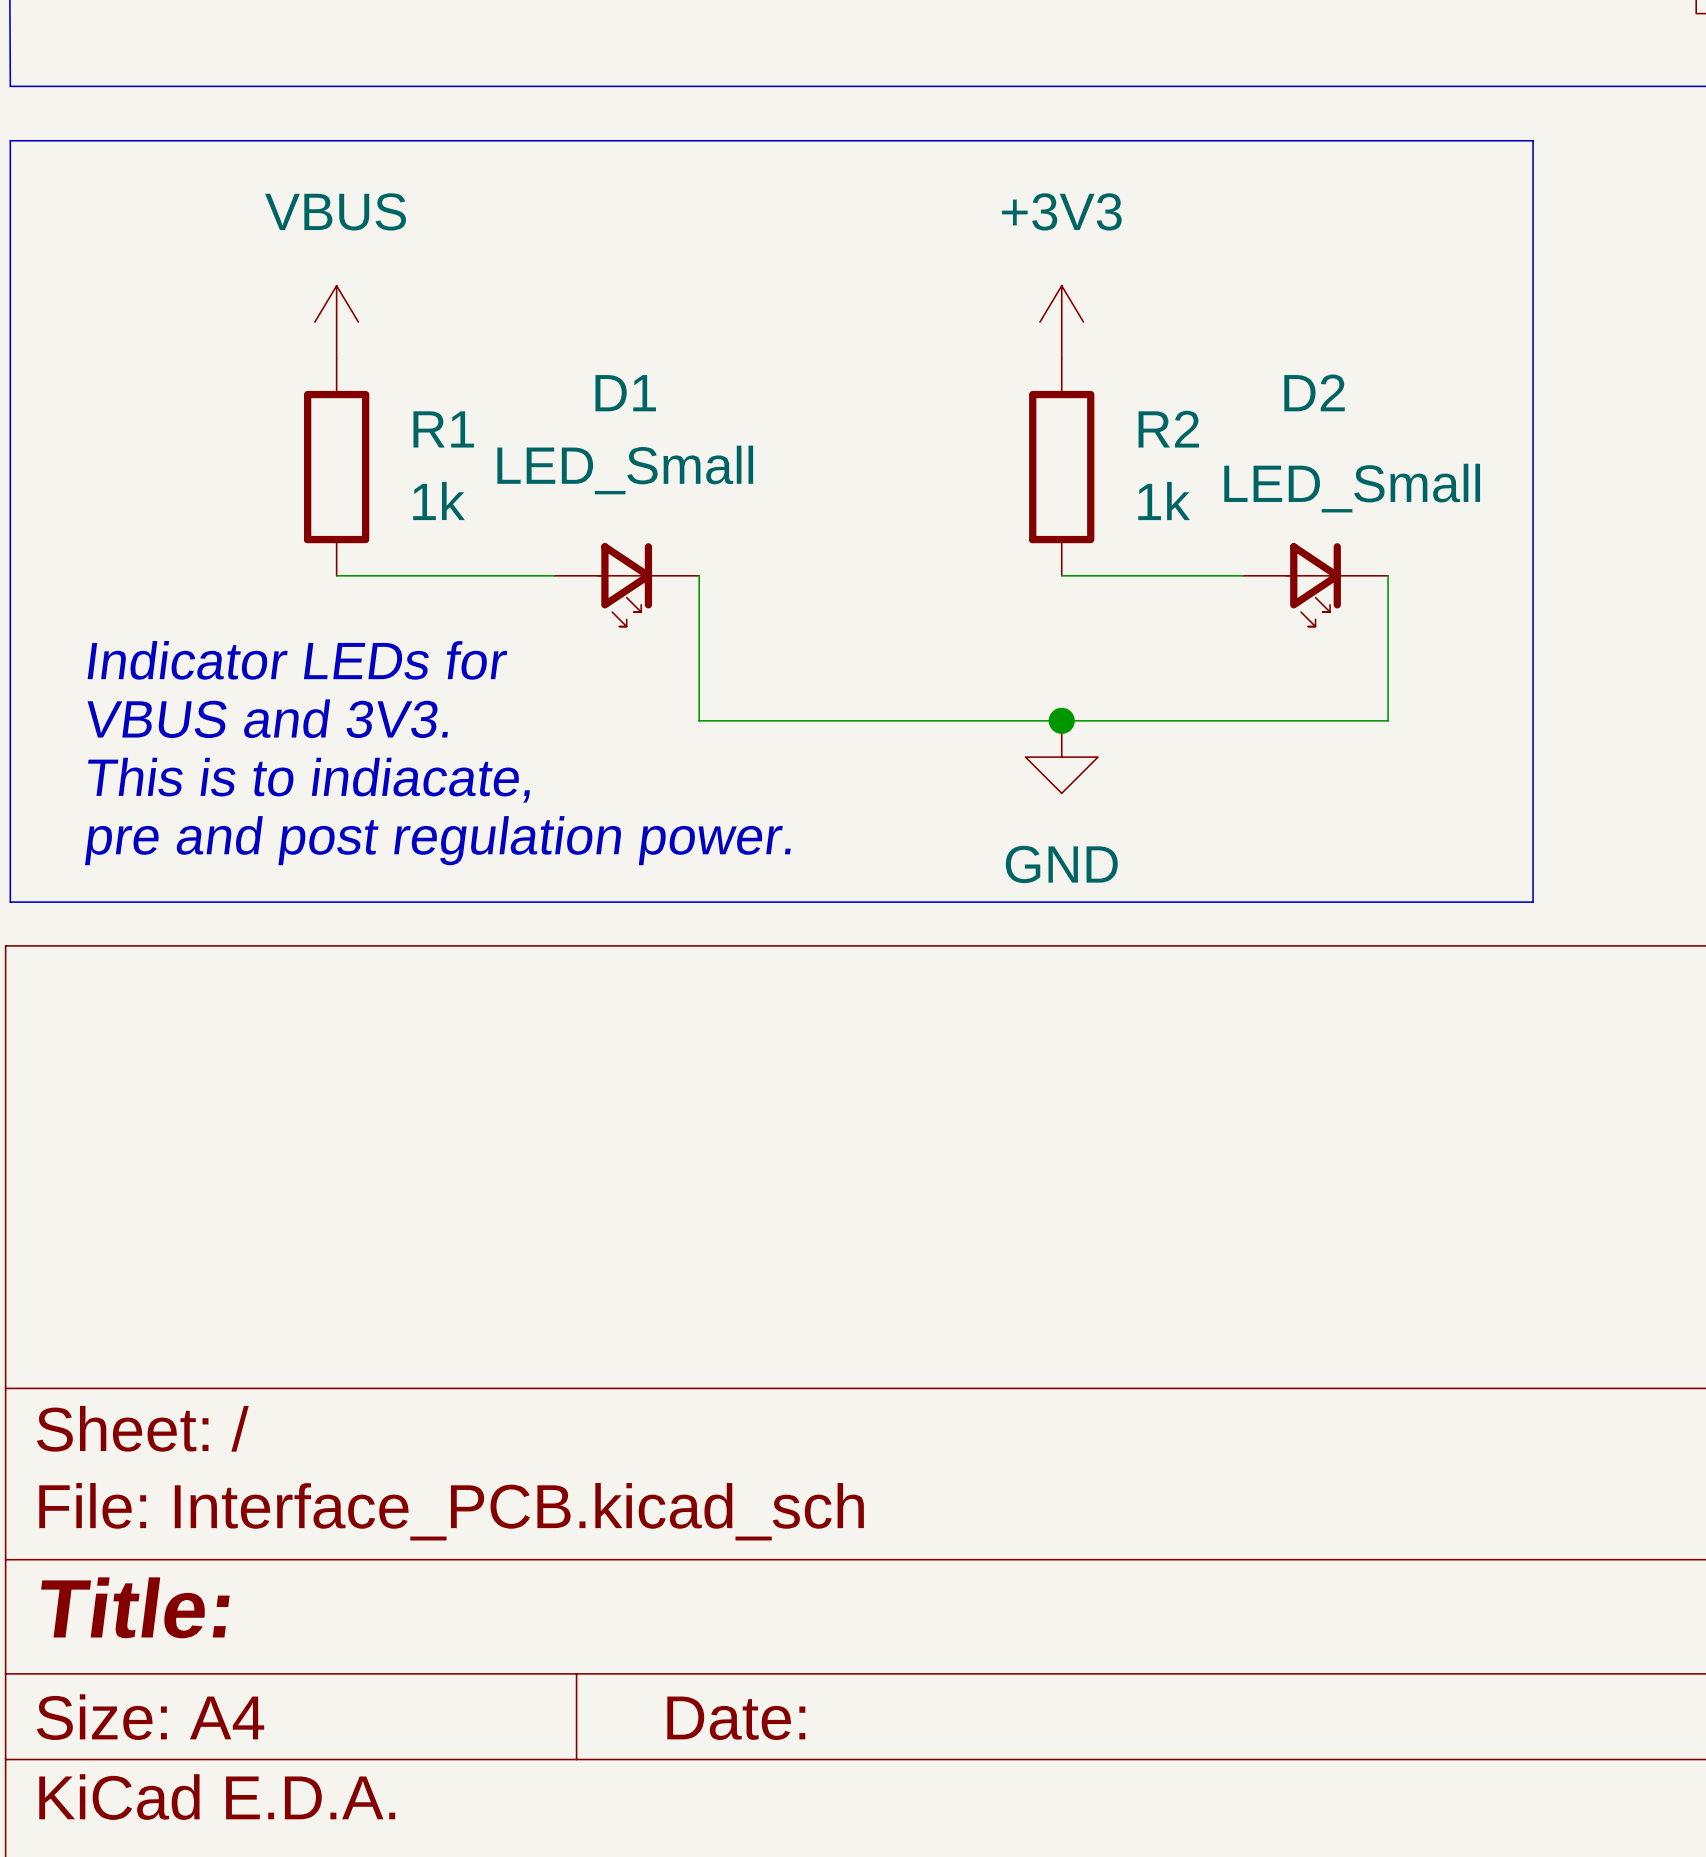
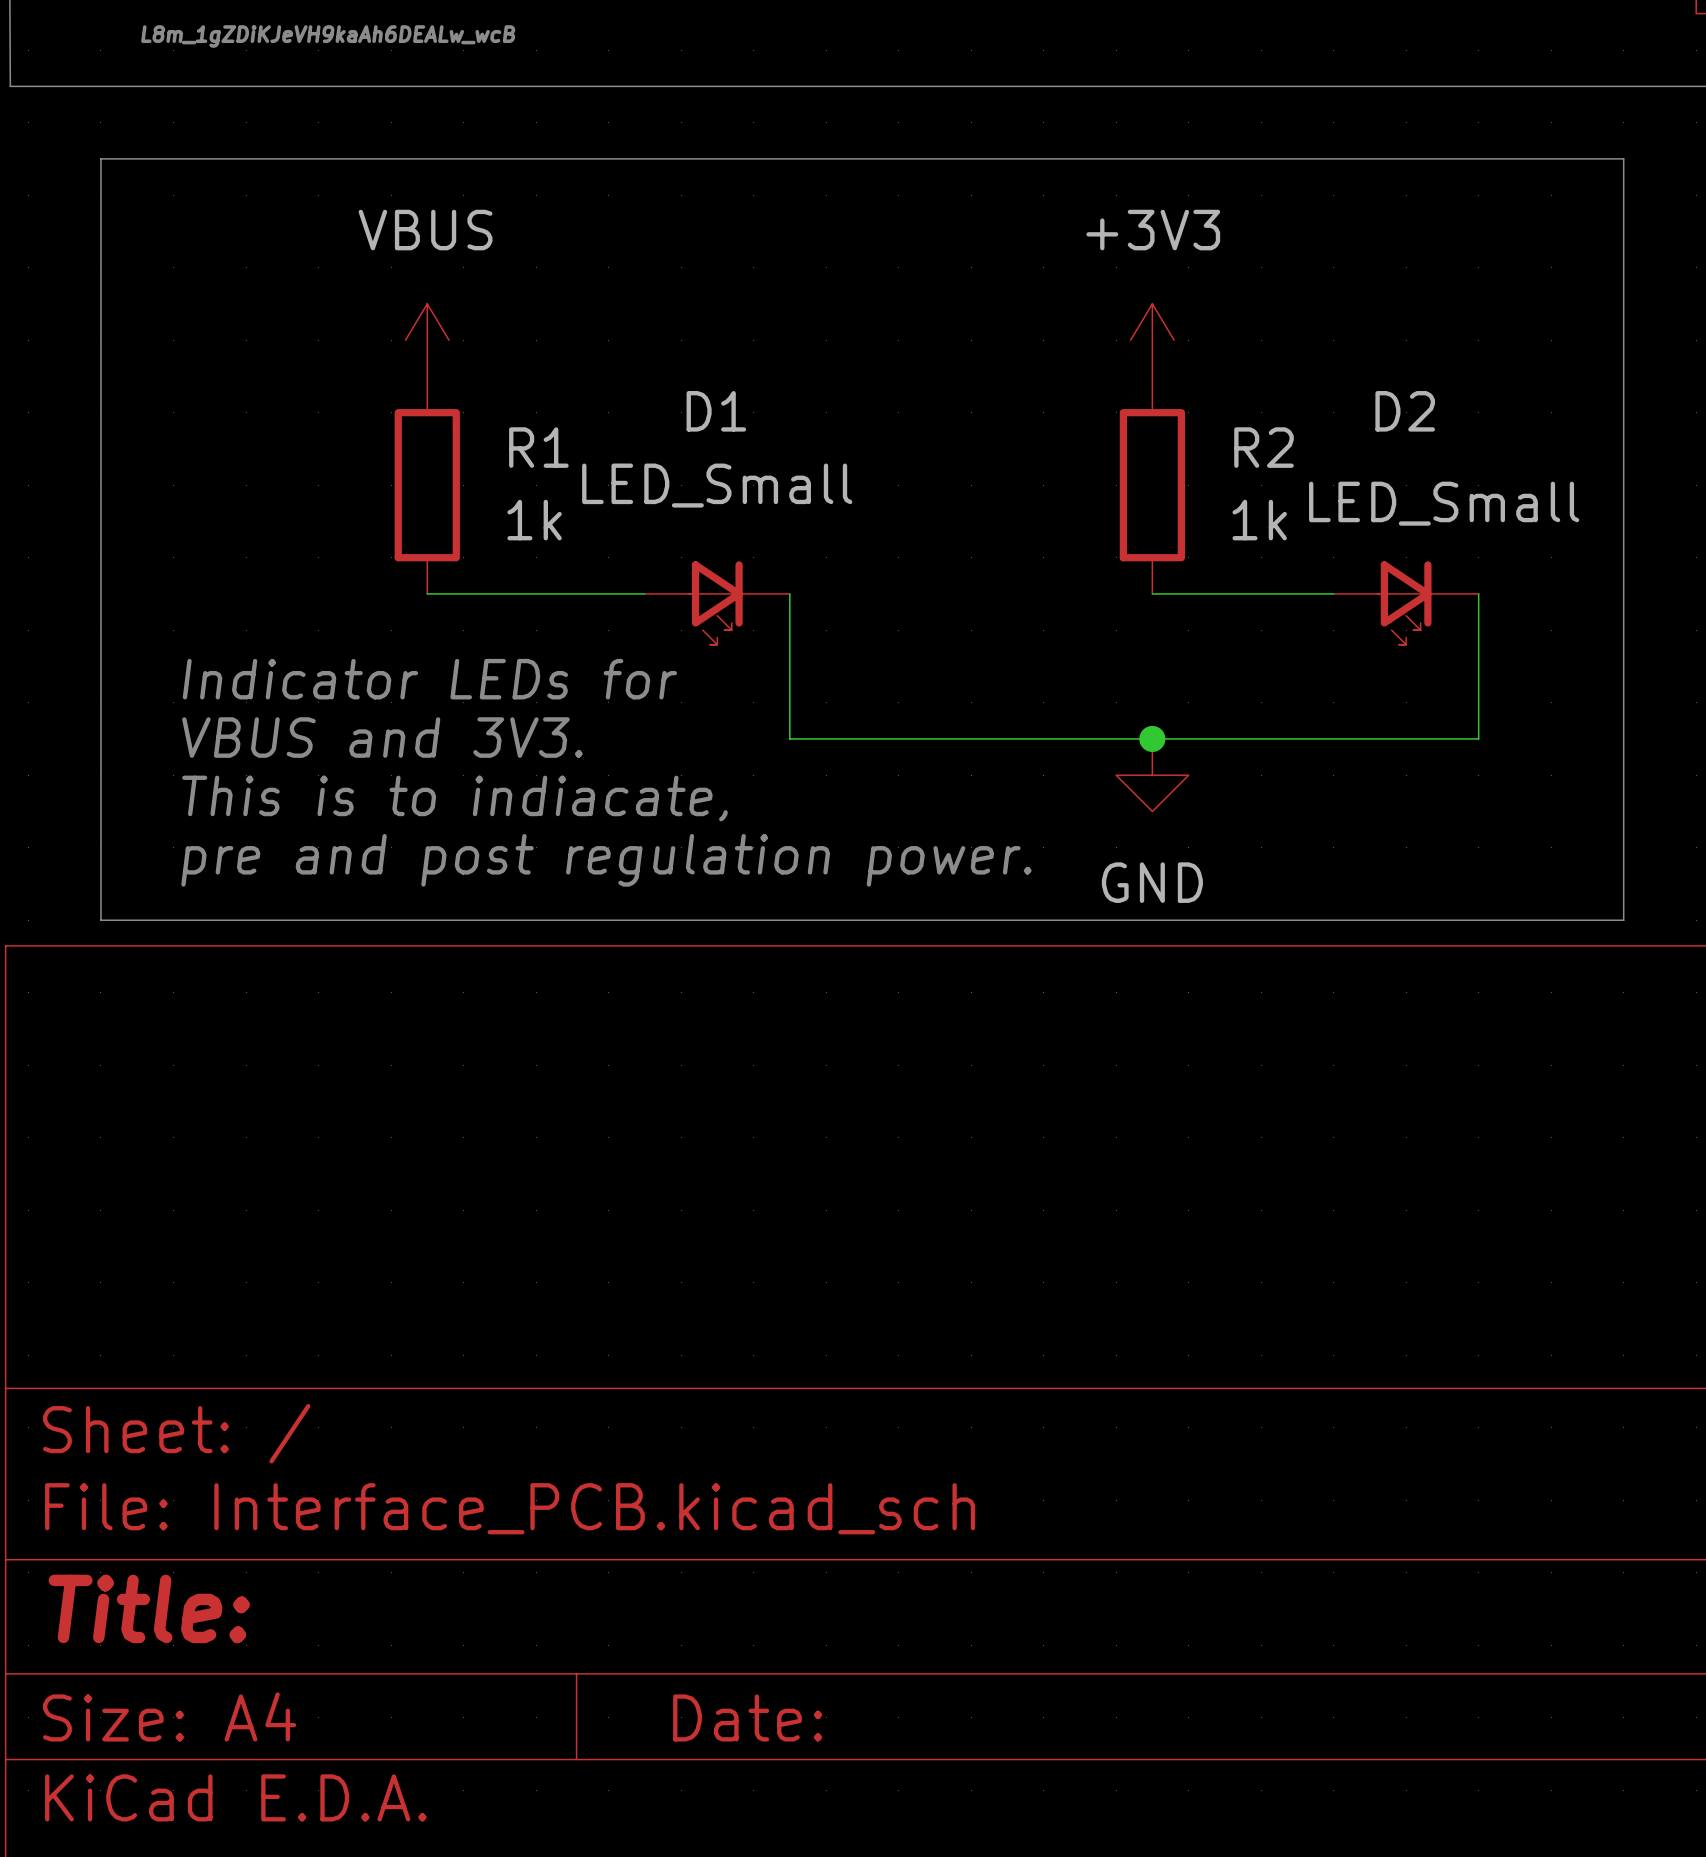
text: none -> L8m_1gZDiKJeVH9kaAh6DEALw_wcB (328, 36)
line: (10, 140) (1533, 140) (1533, 902) (10, 902) (10, 140) -> (100, 158) (1623, 158) (1623, 920) (100, 920) (100, 158)
power symbol position: VBUS (336, 322) -> VBUS (427, 340)
power symbol position: +3V3 (1061, 322) -> +3V3 (1152, 340)
R1 position: (336, 467) -> (427, 485)
R2 position: (1061, 467) -> (1152, 485)
wire: (336, 575) (554, 575) -> (427, 593) (644, 593)
wire: (699, 575) (699, 720) (1388, 720) (1388, 575) -> (789, 593) (789, 738) (1478, 738) (1478, 593)
wire: (1061, 575) (1243, 575) -> (1152, 593) (1333, 593)
D1 position: (626, 584) -> (717, 603)
D2 position: (1315, 584) -> (1406, 603)
text position: Indicator LEDs for (297, 660) -> Indicator LEDs for (429, 679)
text position: VBUS and 3V3. (267, 718) -> VBUS and 3V3. (382, 737)
junction position: (1061, 720) -> (1152, 738)
power symbol position: GND (1061, 757) -> GND (1152, 775)
text position: This is to indiacate, (308, 780) -> This is to indiacate, (454, 798)
text position: pre and post regulation power. (437, 840) -> pre and post regulation power. (606, 860)

